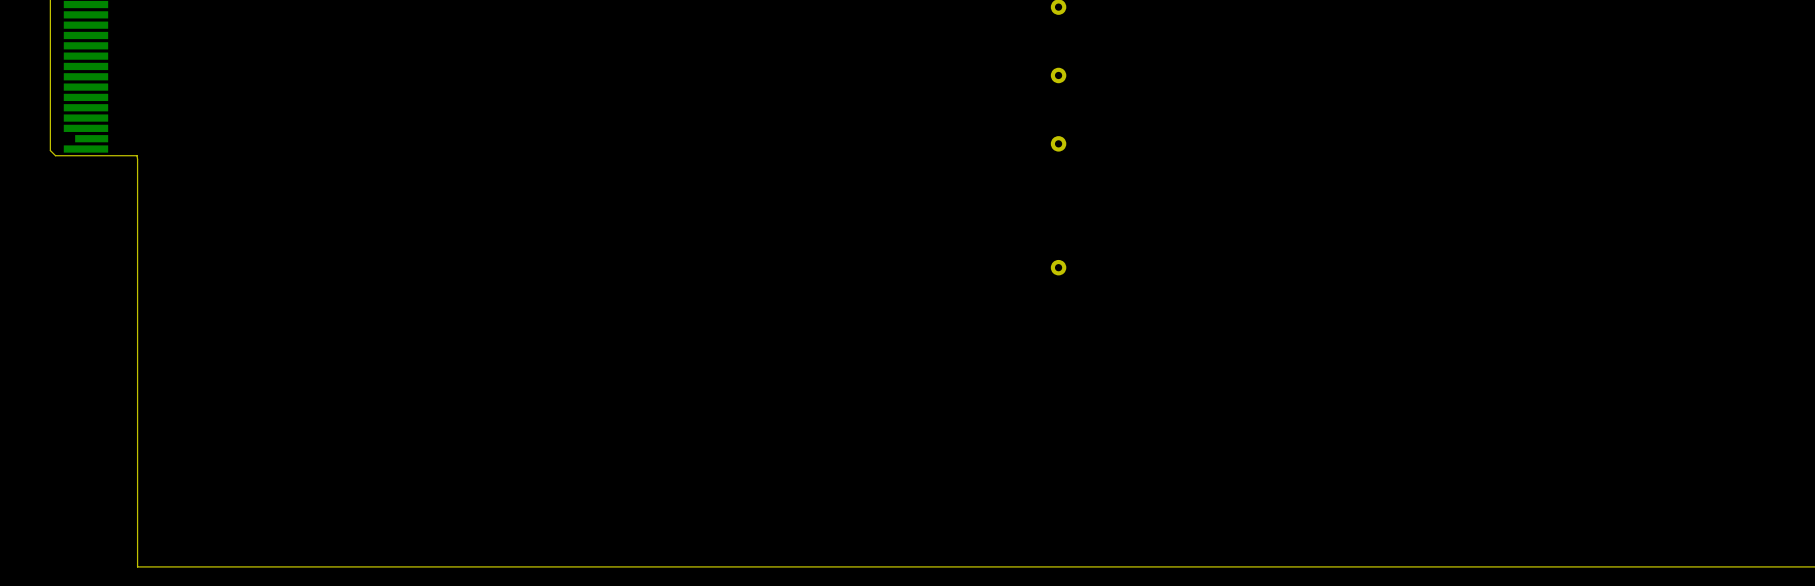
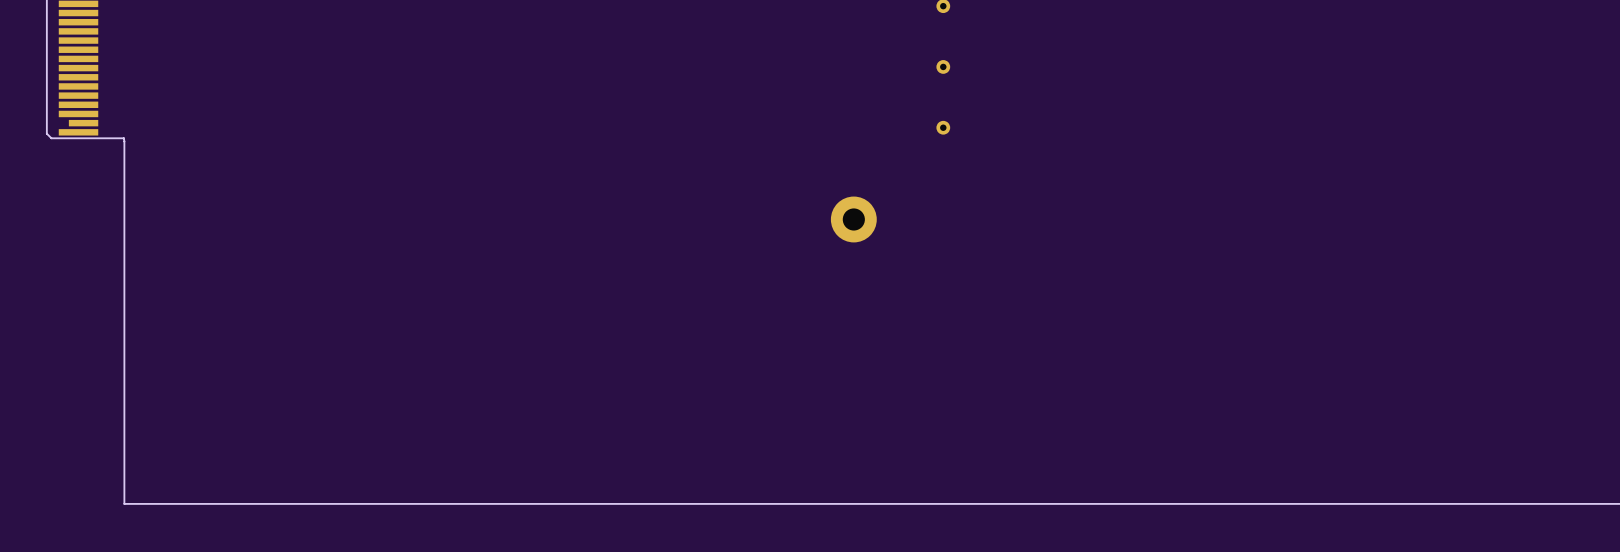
part: none -> (853, 219)
part: (1058, 267) -> none

